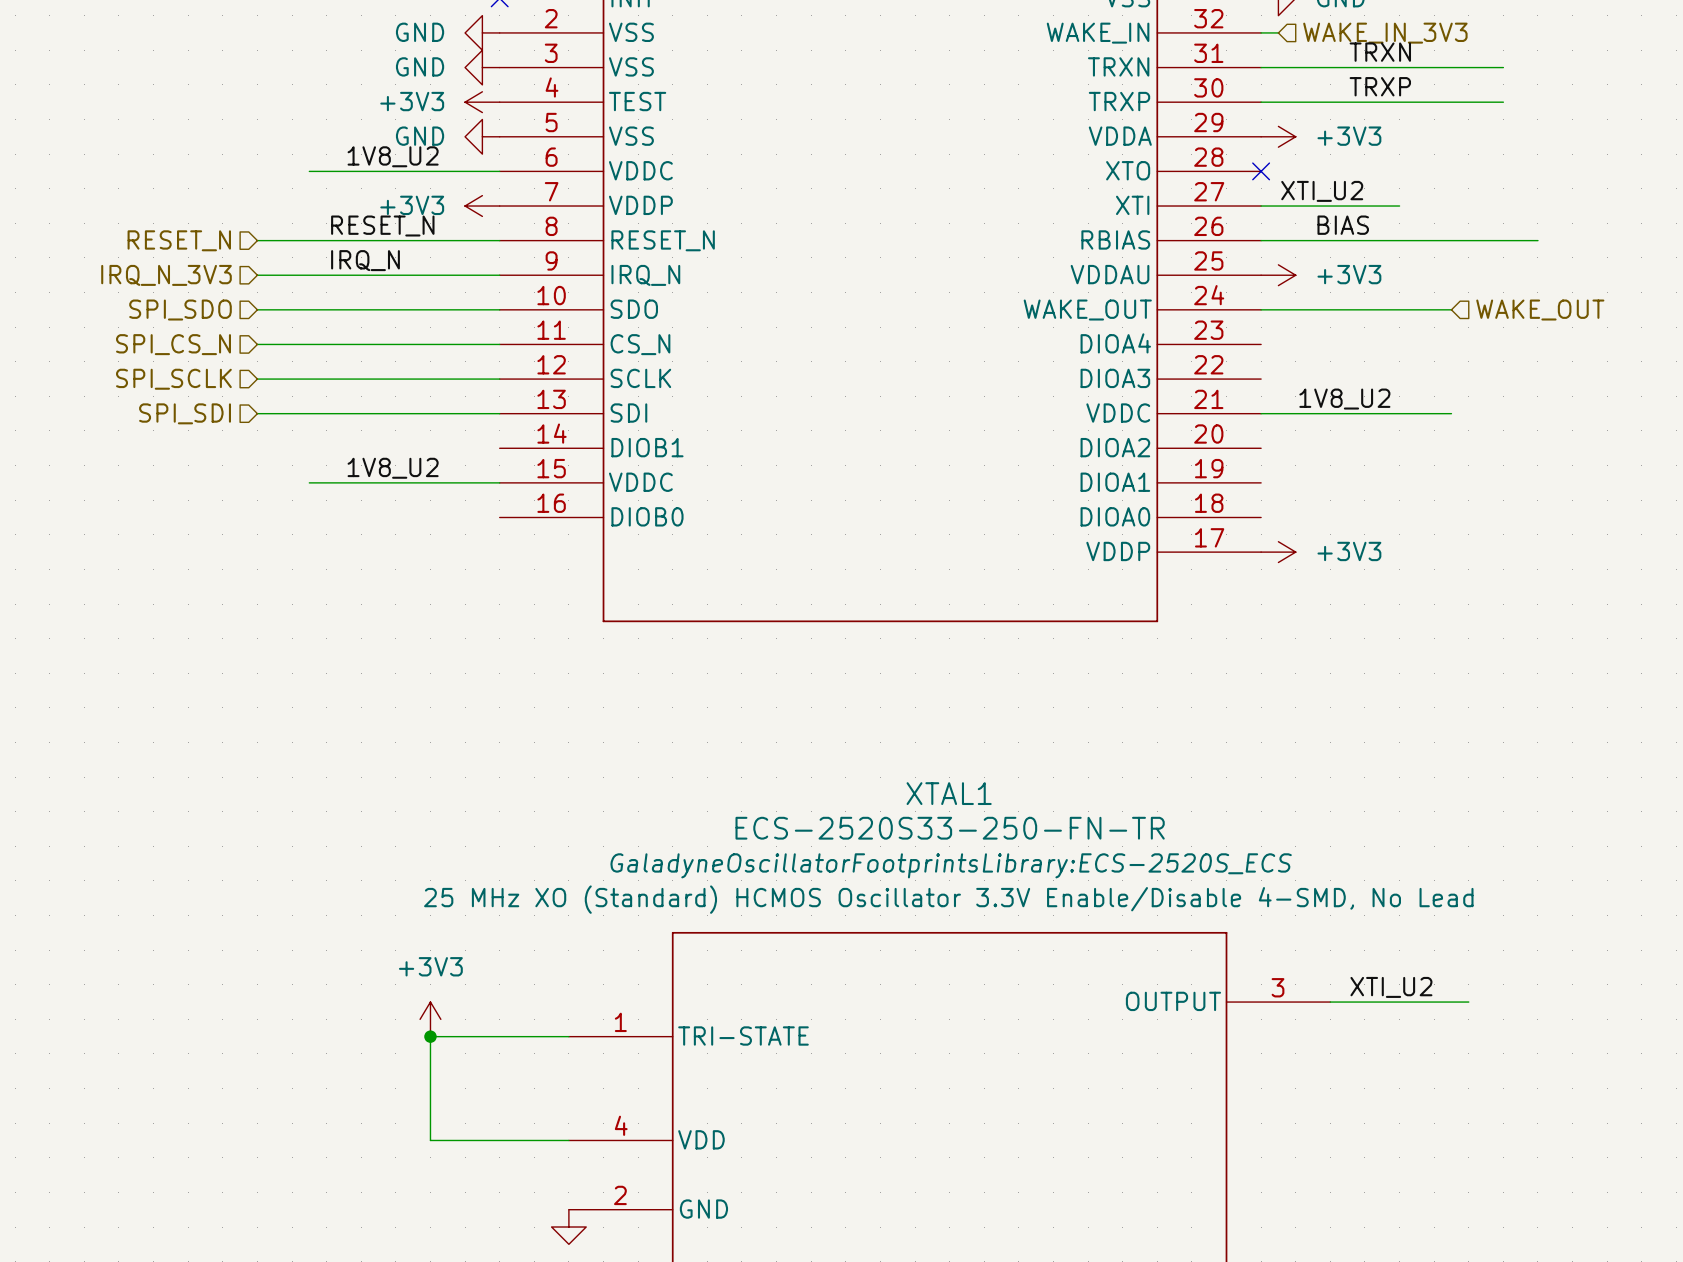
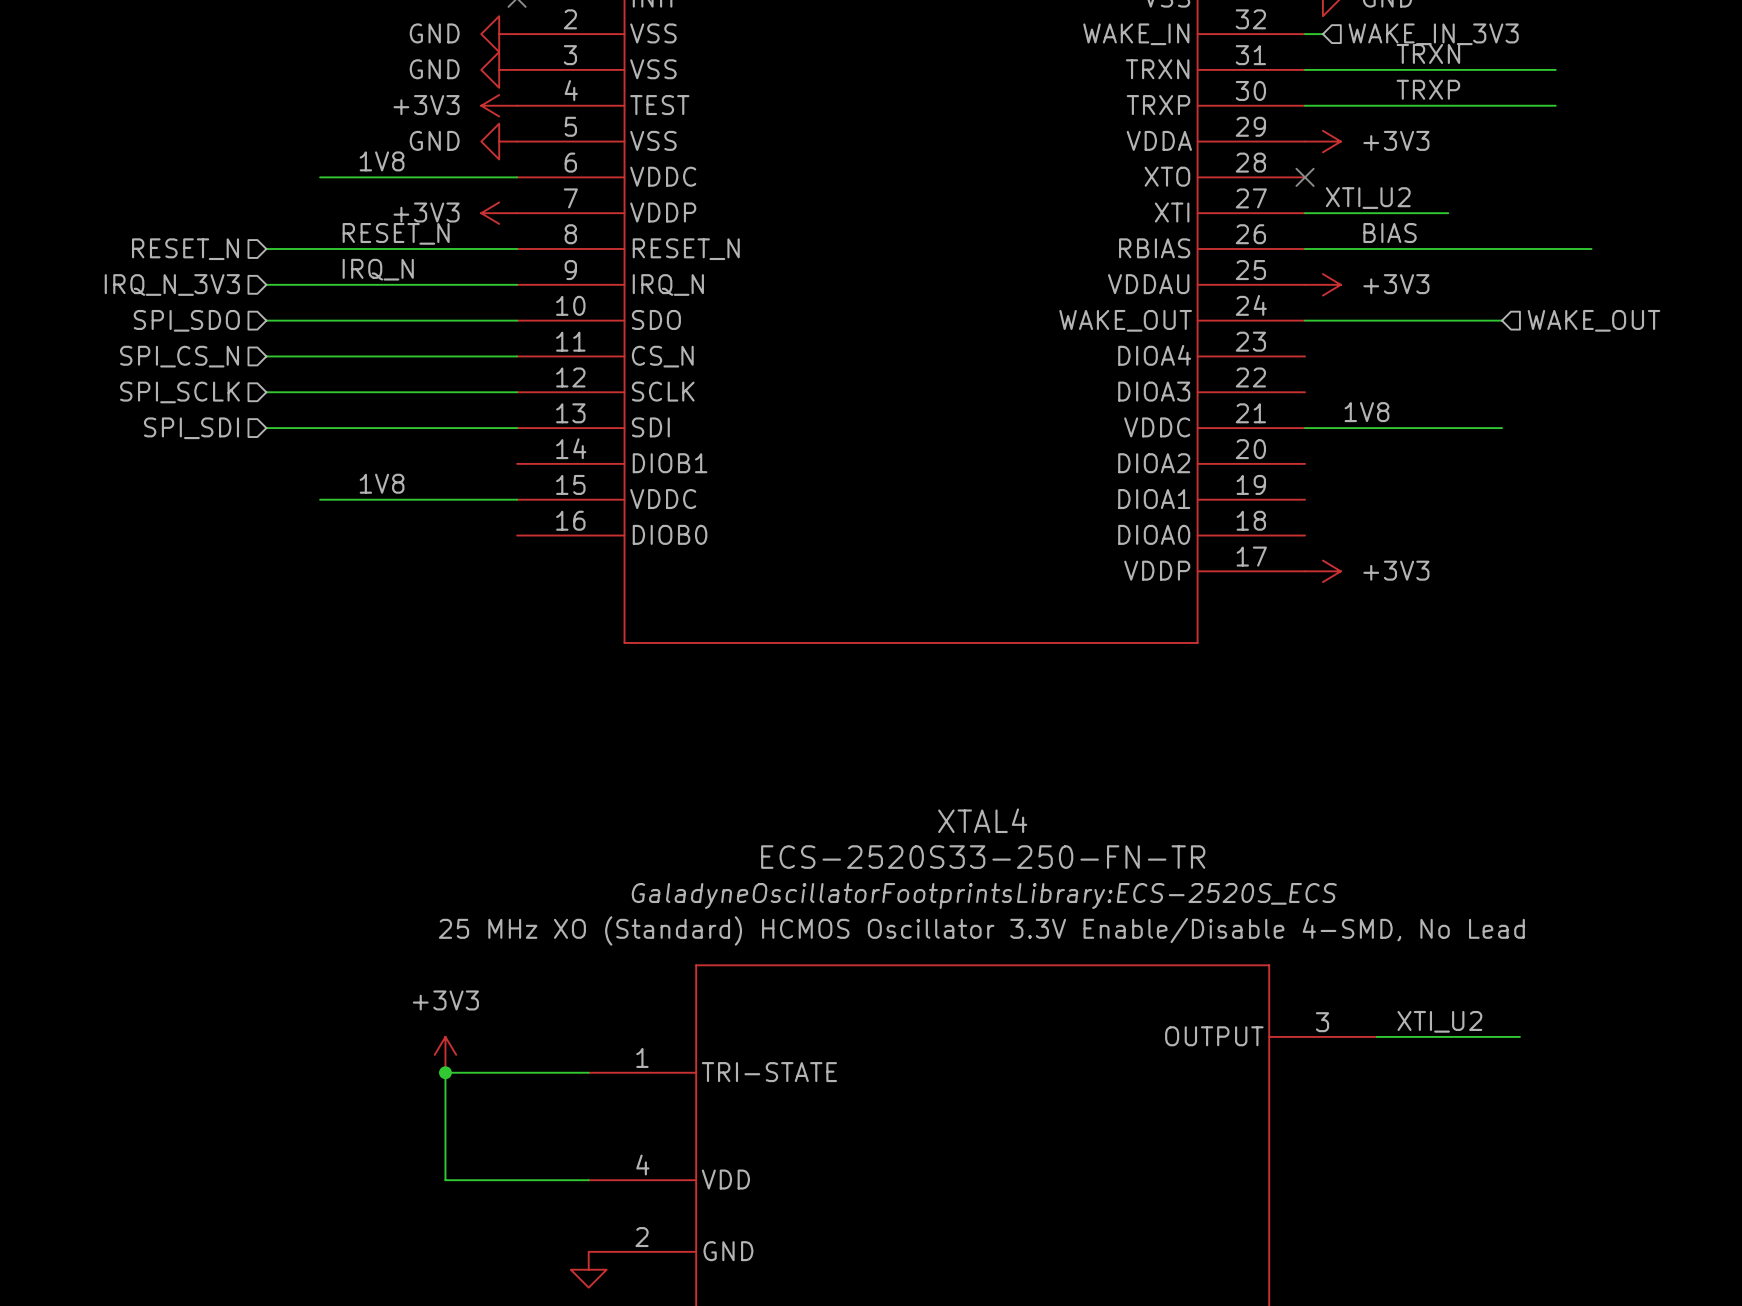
label: 1V8_U2 (393, 156) -> 1V8 (382, 161)
label: 1V8_U2 (1344, 399) -> 1V8 (1366, 412)
label: 1V8_U2 (393, 468) -> 1V8 (382, 483)
XTAL1 name: XTAL1 (949, 793) -> XTAL4 (982, 820)

